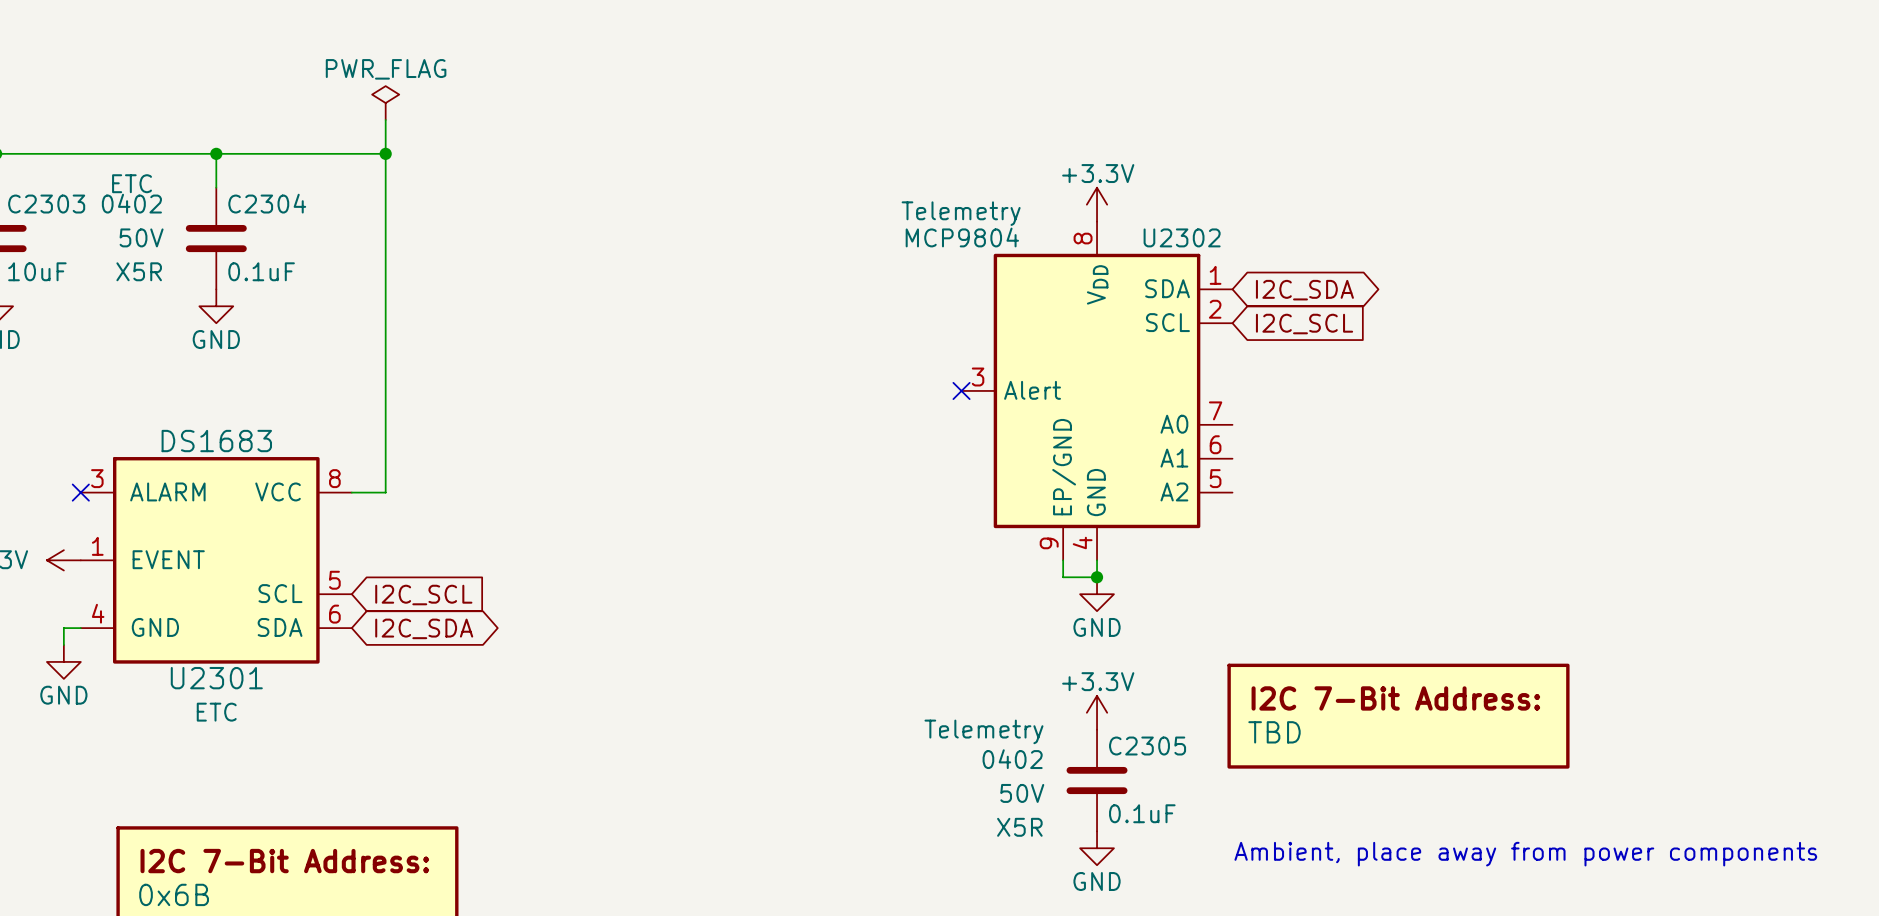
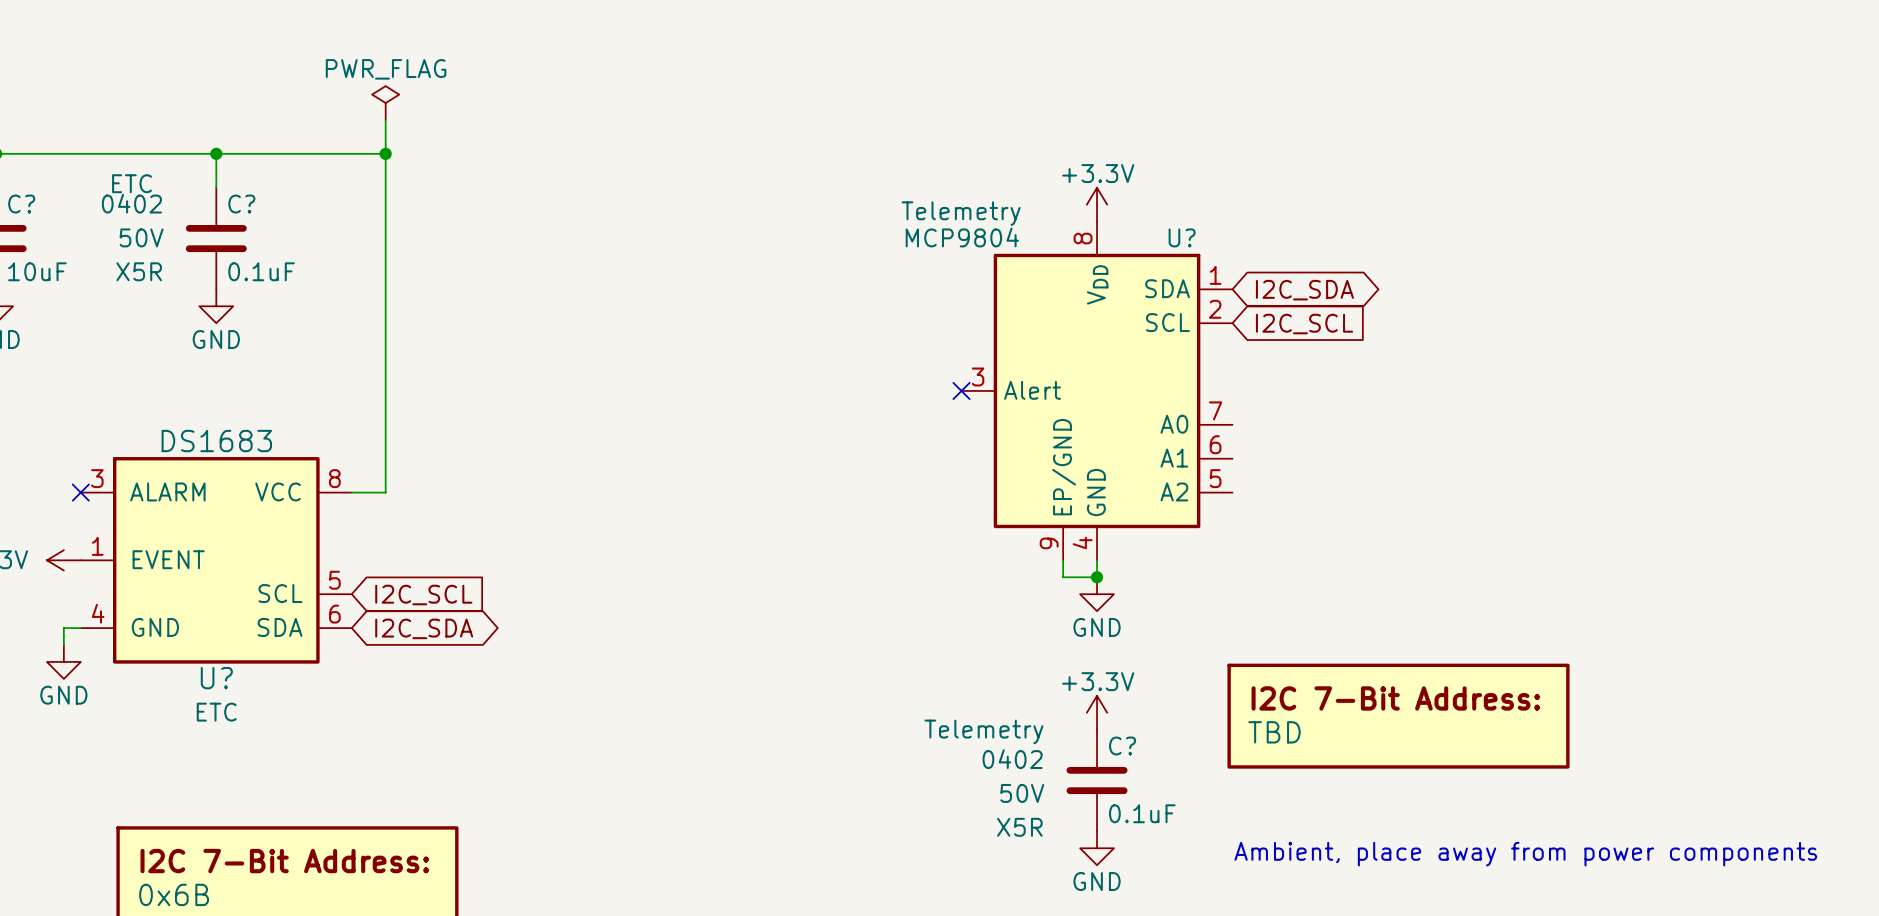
C2304 name: C2304 (267, 203) -> C? (241, 204)
C2303 name: C2303 (46, 204) -> C? (21, 204)
U2302 name: U2302 (1182, 237) -> U? (1182, 237)
U2301 name: U2301 (216, 678) -> U? (216, 678)
C2305 name: C2305 (1147, 746) -> C? (1122, 746)

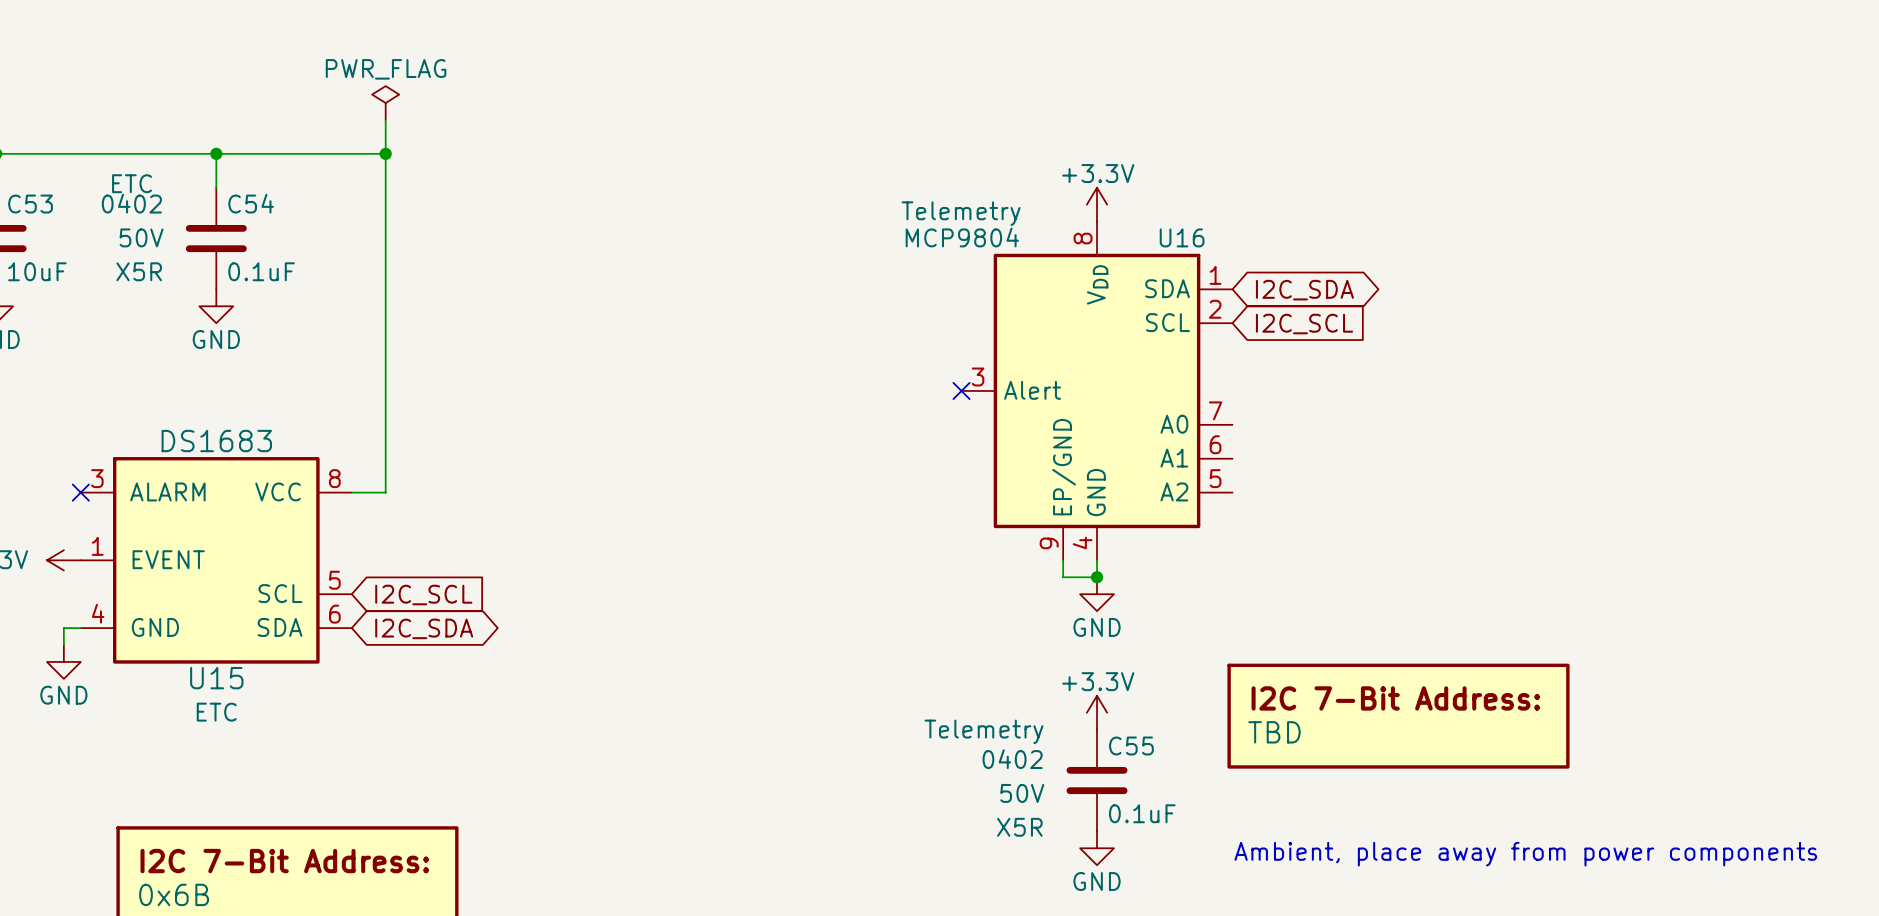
C? name: C? (21, 204) -> C53 (30, 204)
C? name: C? (241, 204) -> C54 (251, 203)
U? name: U? (1182, 237) -> U16 (1182, 237)
U? name: U? (216, 678) -> U15 (216, 678)
C? name: C? (1122, 746) -> C55 (1131, 746)

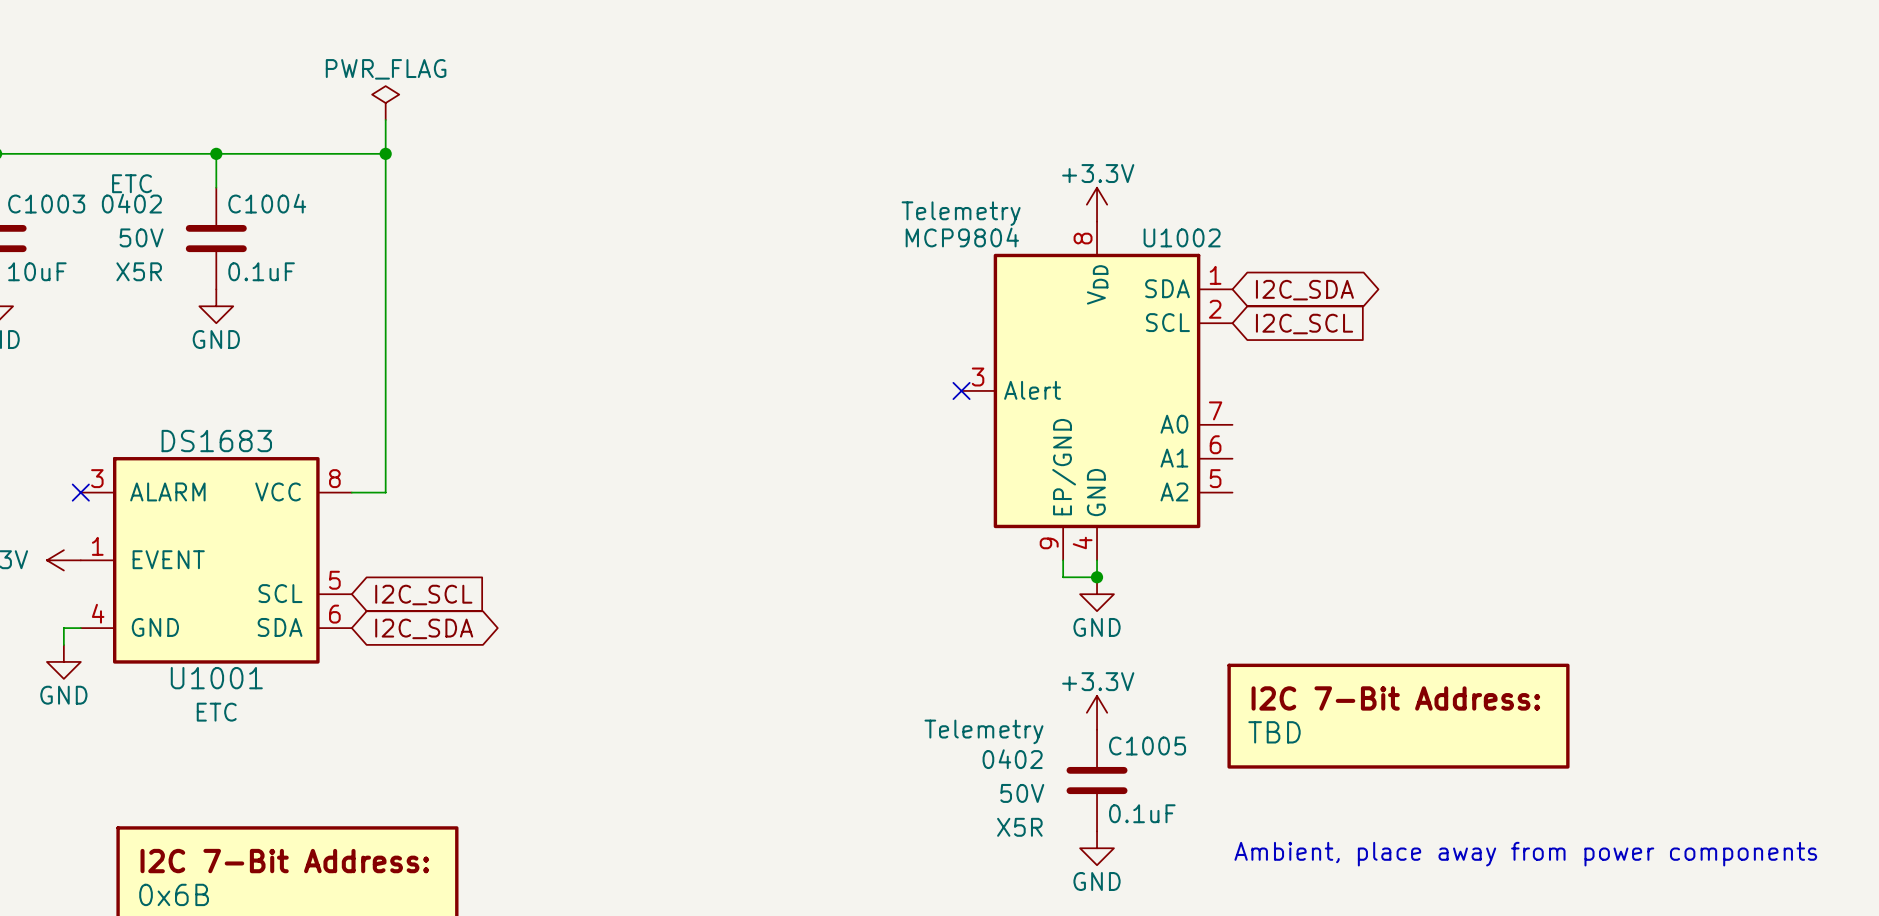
C54 name: C54 (251, 203) -> C1004 (267, 203)
C53 name: C53 (30, 204) -> C1003 (46, 204)
U16 name: U16 (1182, 237) -> U1002 (1182, 237)
U15 name: U15 (216, 678) -> U1001 (216, 678)
C55 name: C55 (1131, 746) -> C1005 (1147, 746)

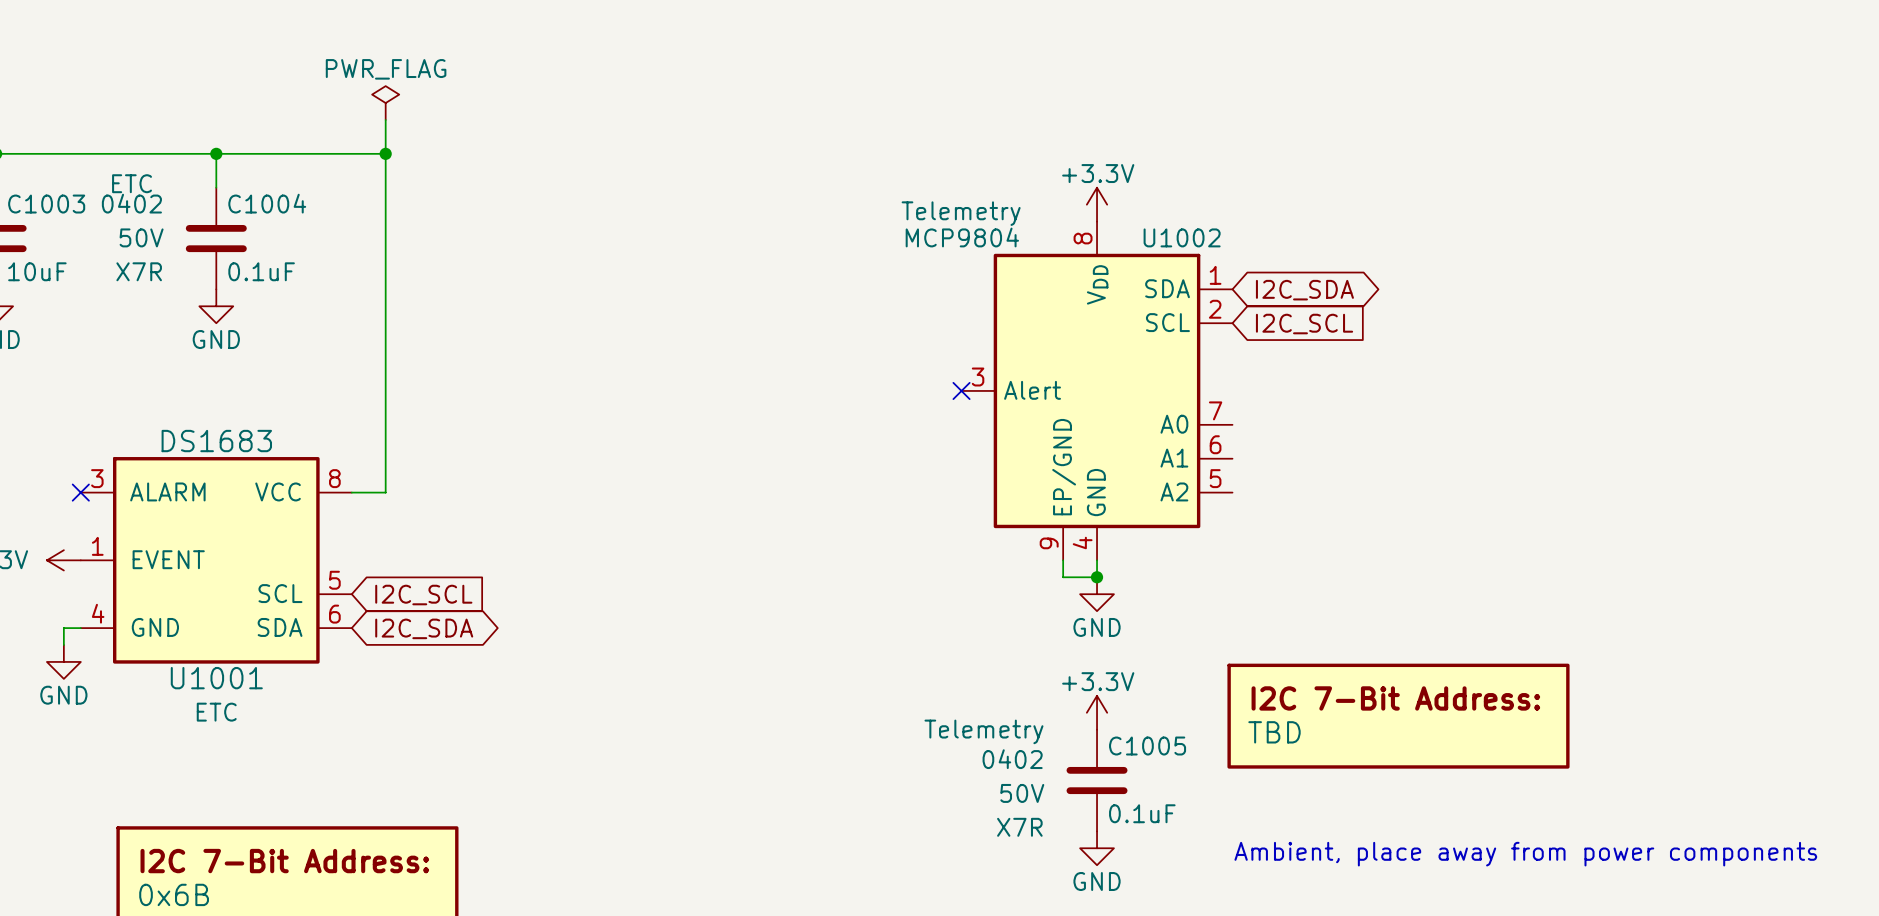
C1004 text: X5R (139, 271) -> X7R (139, 271)
C1005 text: X5R (1019, 827) -> X7R (1019, 827)

